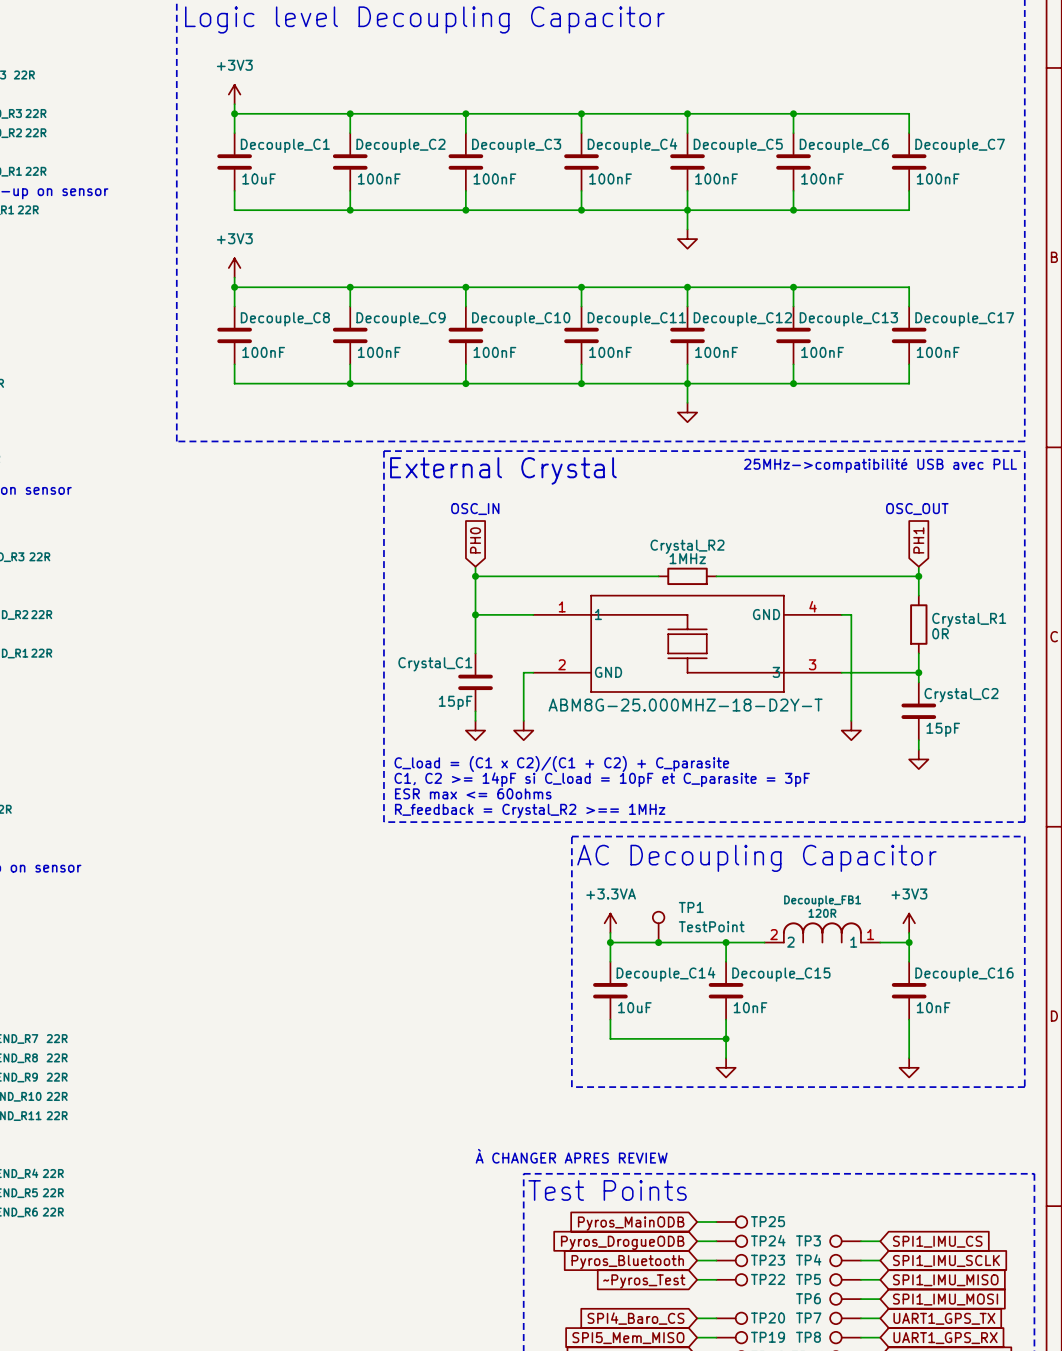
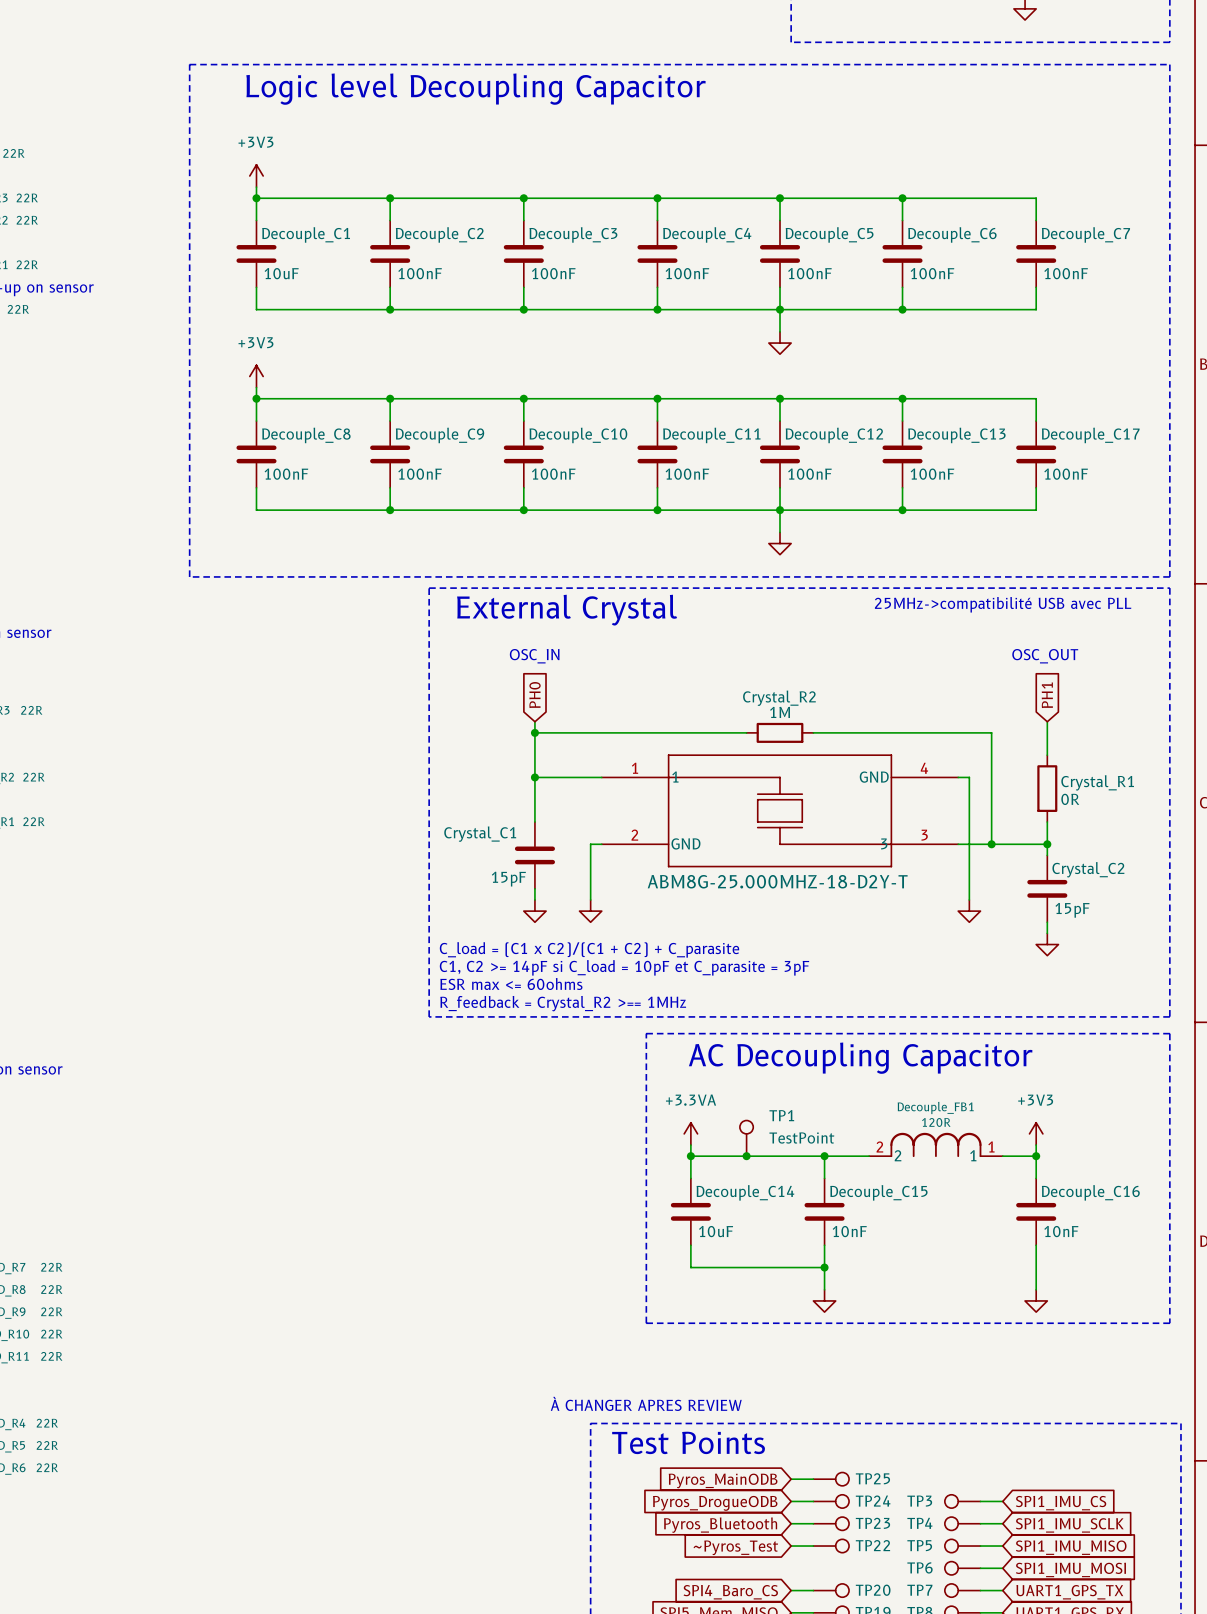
Crystal_R2 value: 1MHz (687, 558) -> 1M (780, 712)
wire: (870, 576) (918, 576) -> (991, 732) (991, 844)
junction: (918, 576) -> none
junction: none -> (991, 844)

